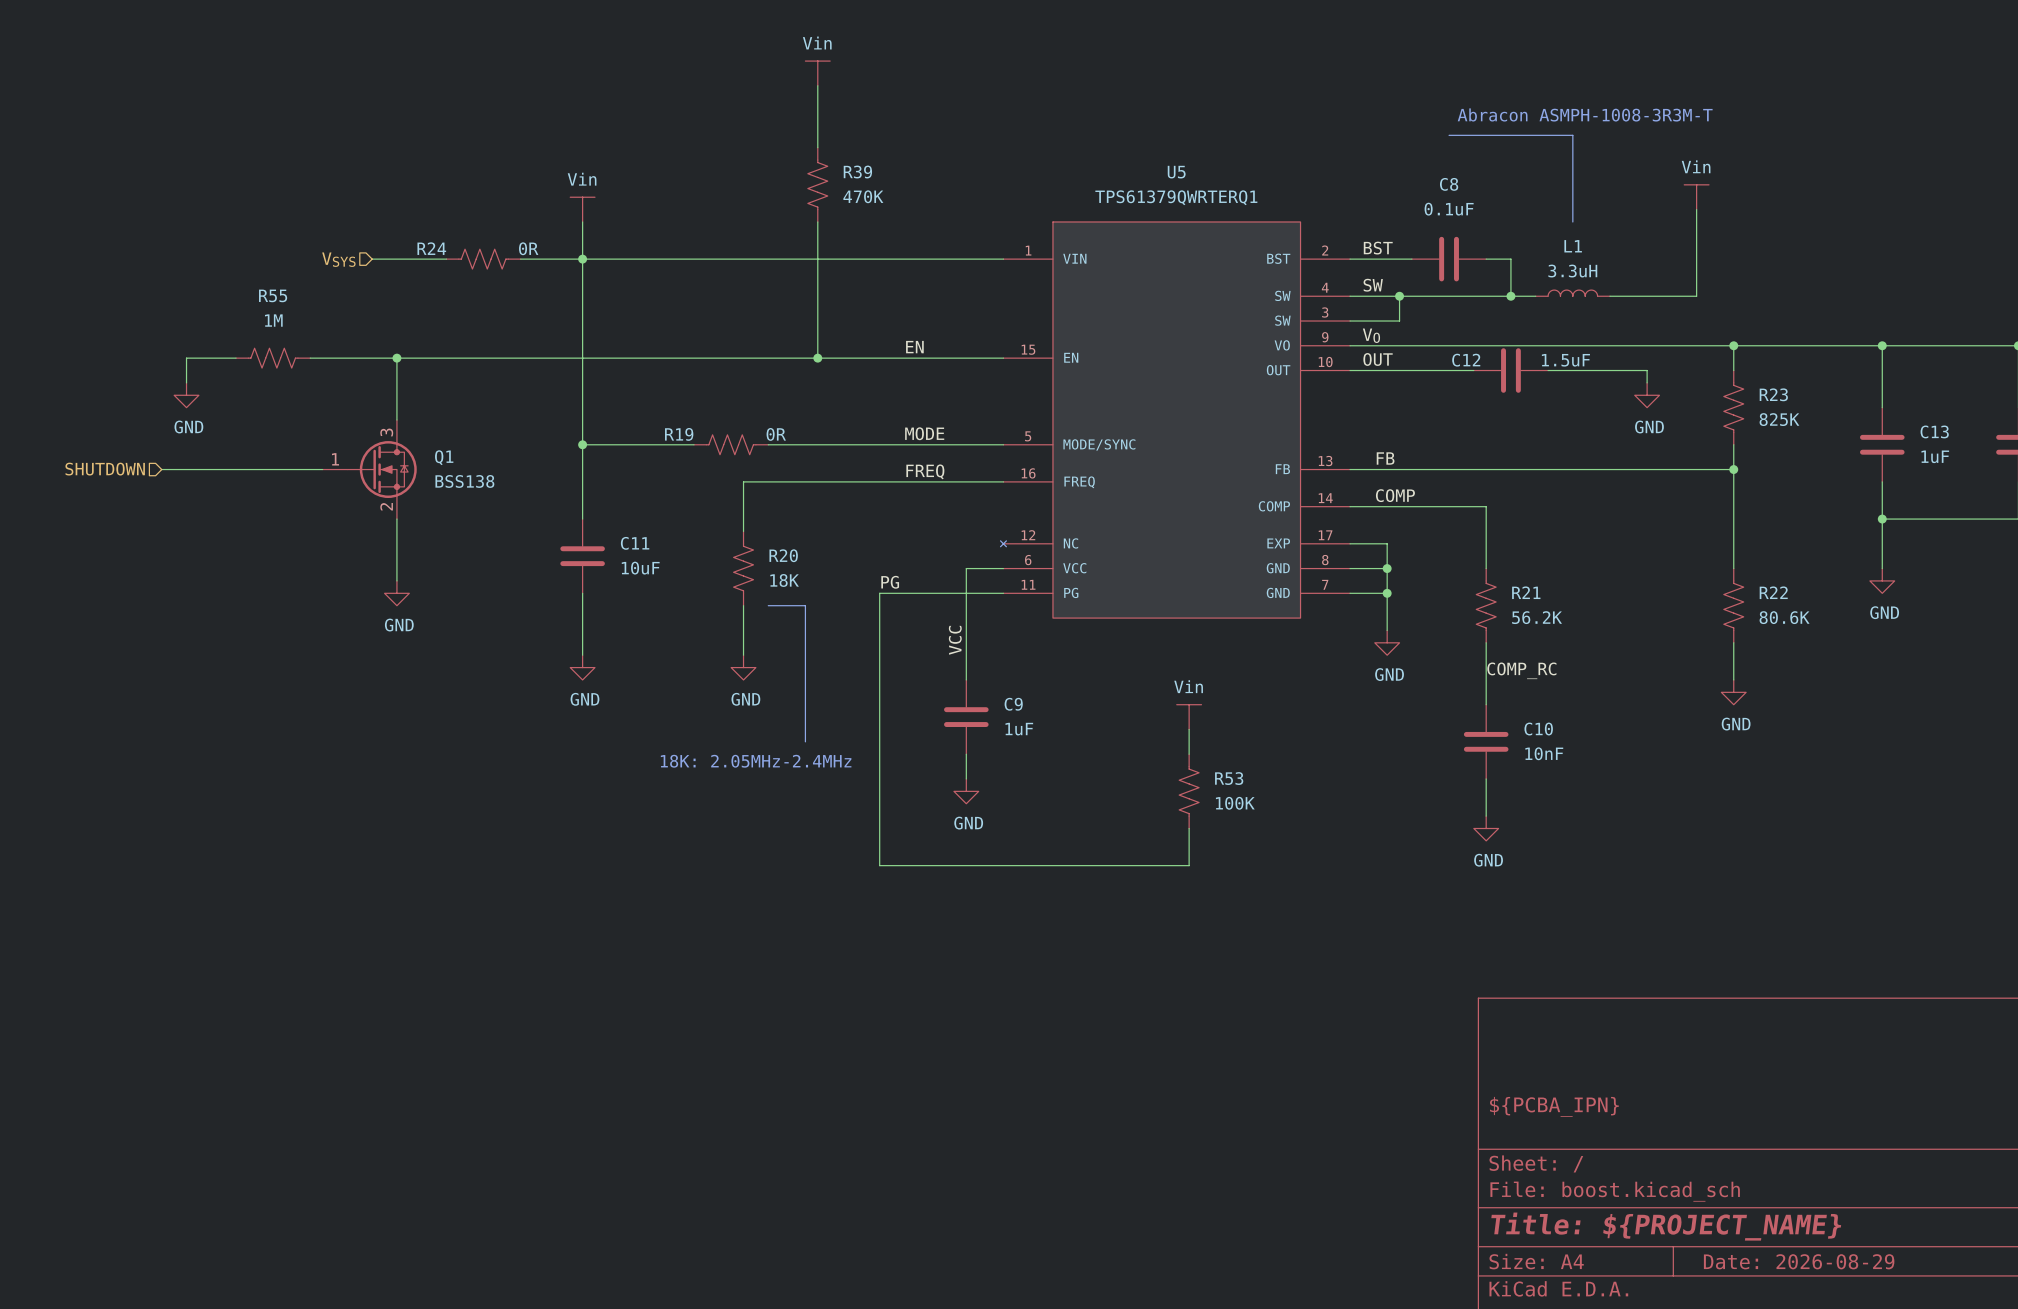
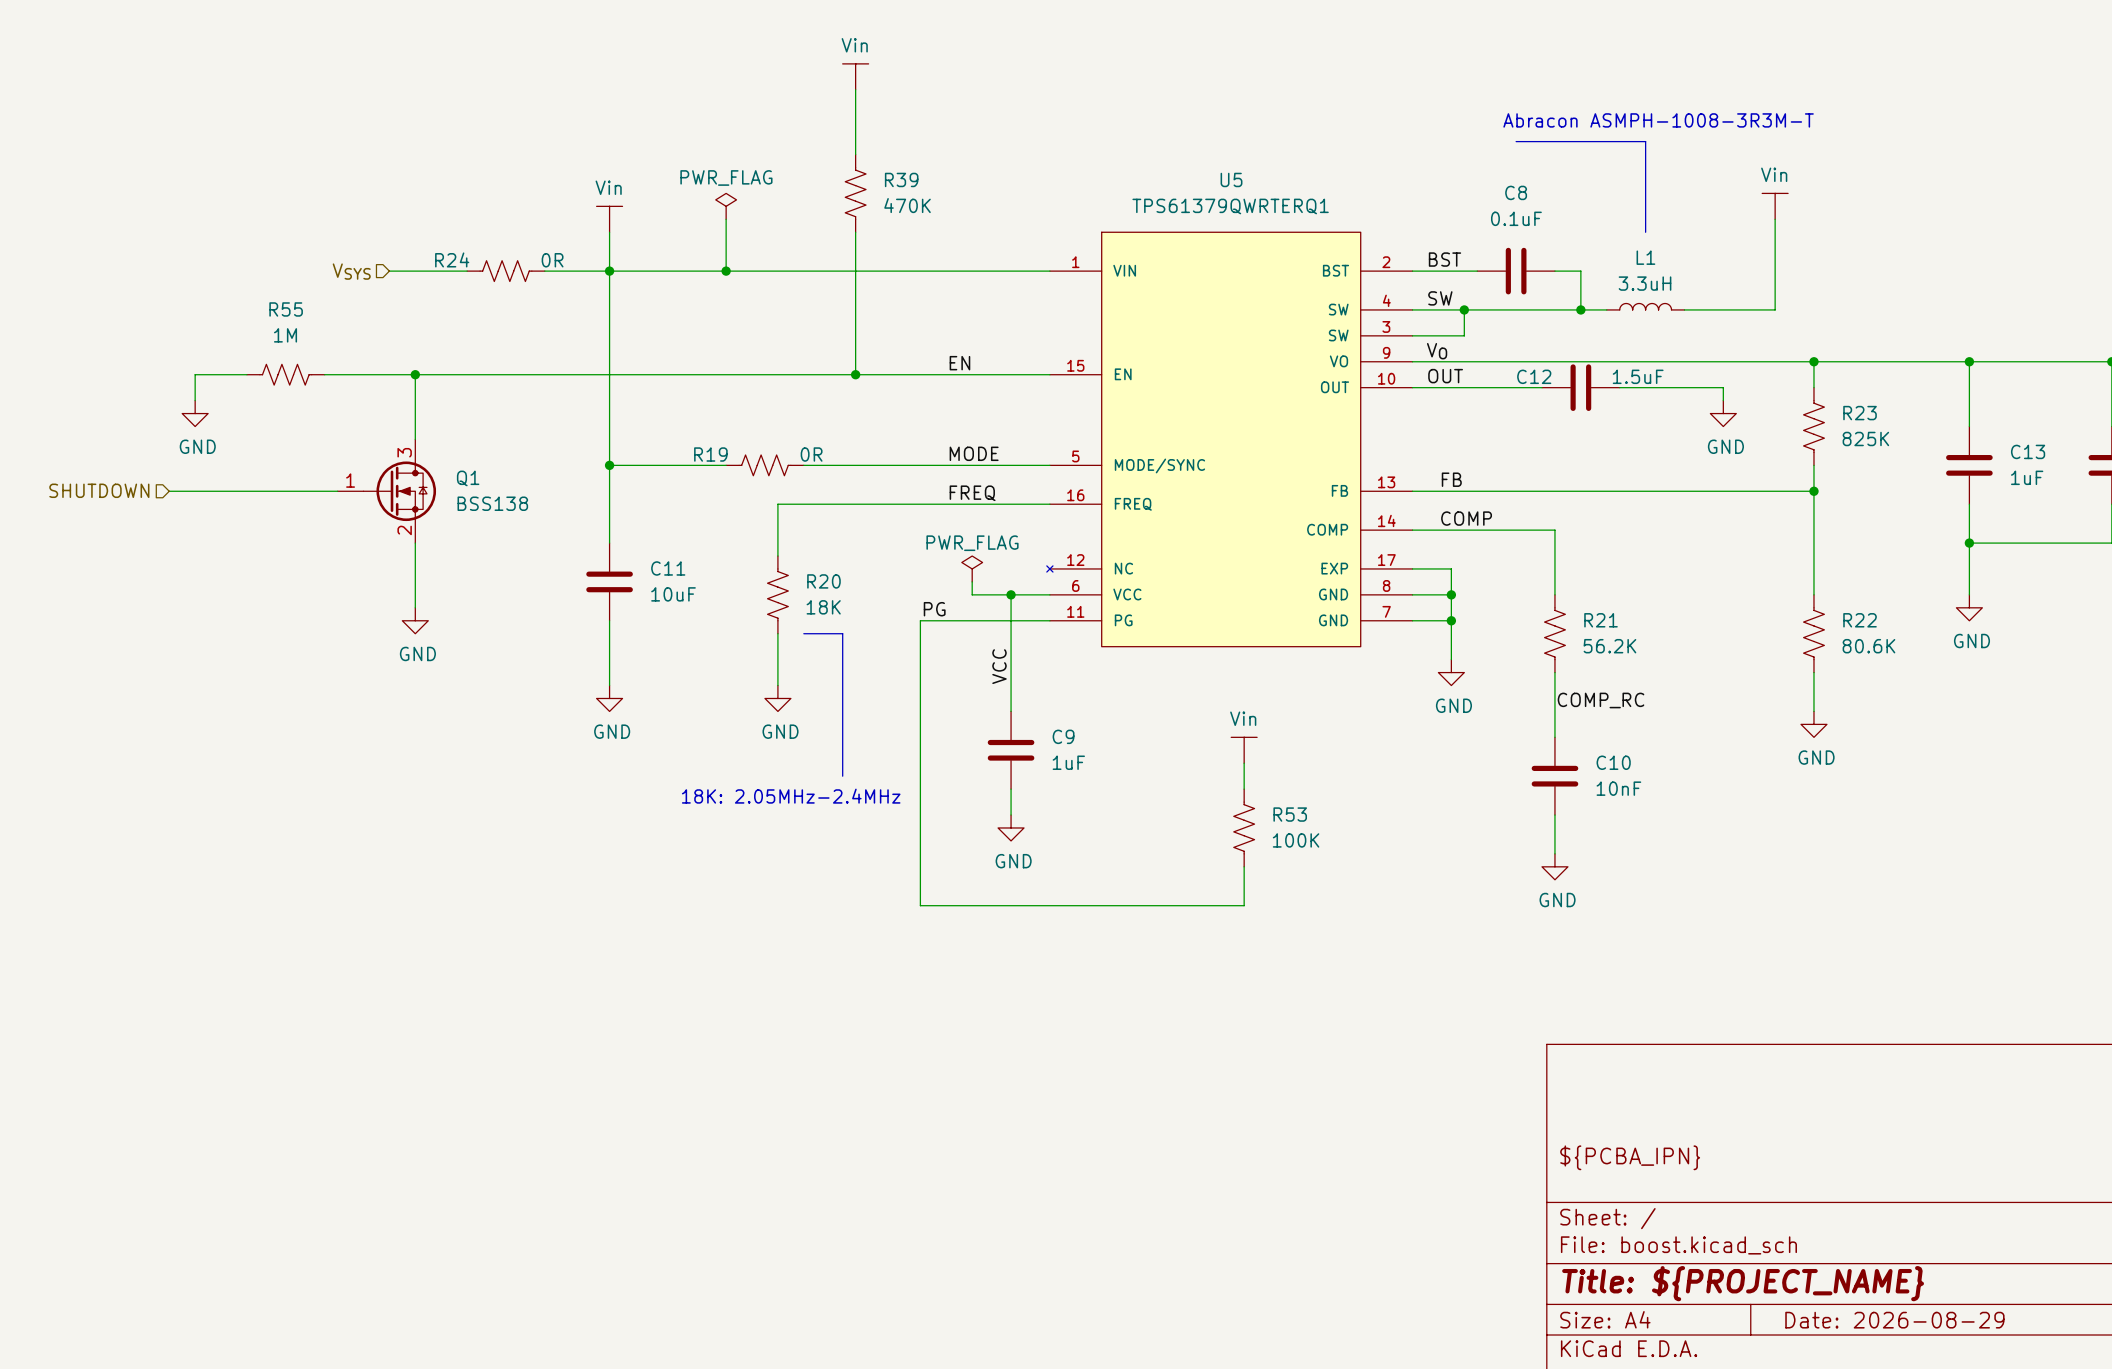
power symbol: none -> PWR_FLAG (726, 206)
wire: none -> (726, 219) (726, 271)
junction: none -> (726, 271)
power symbol: none -> PWR_FLAG (972, 568)
wire: none -> (972, 581) (972, 594) (1011, 594)
junction: none -> (1011, 594)

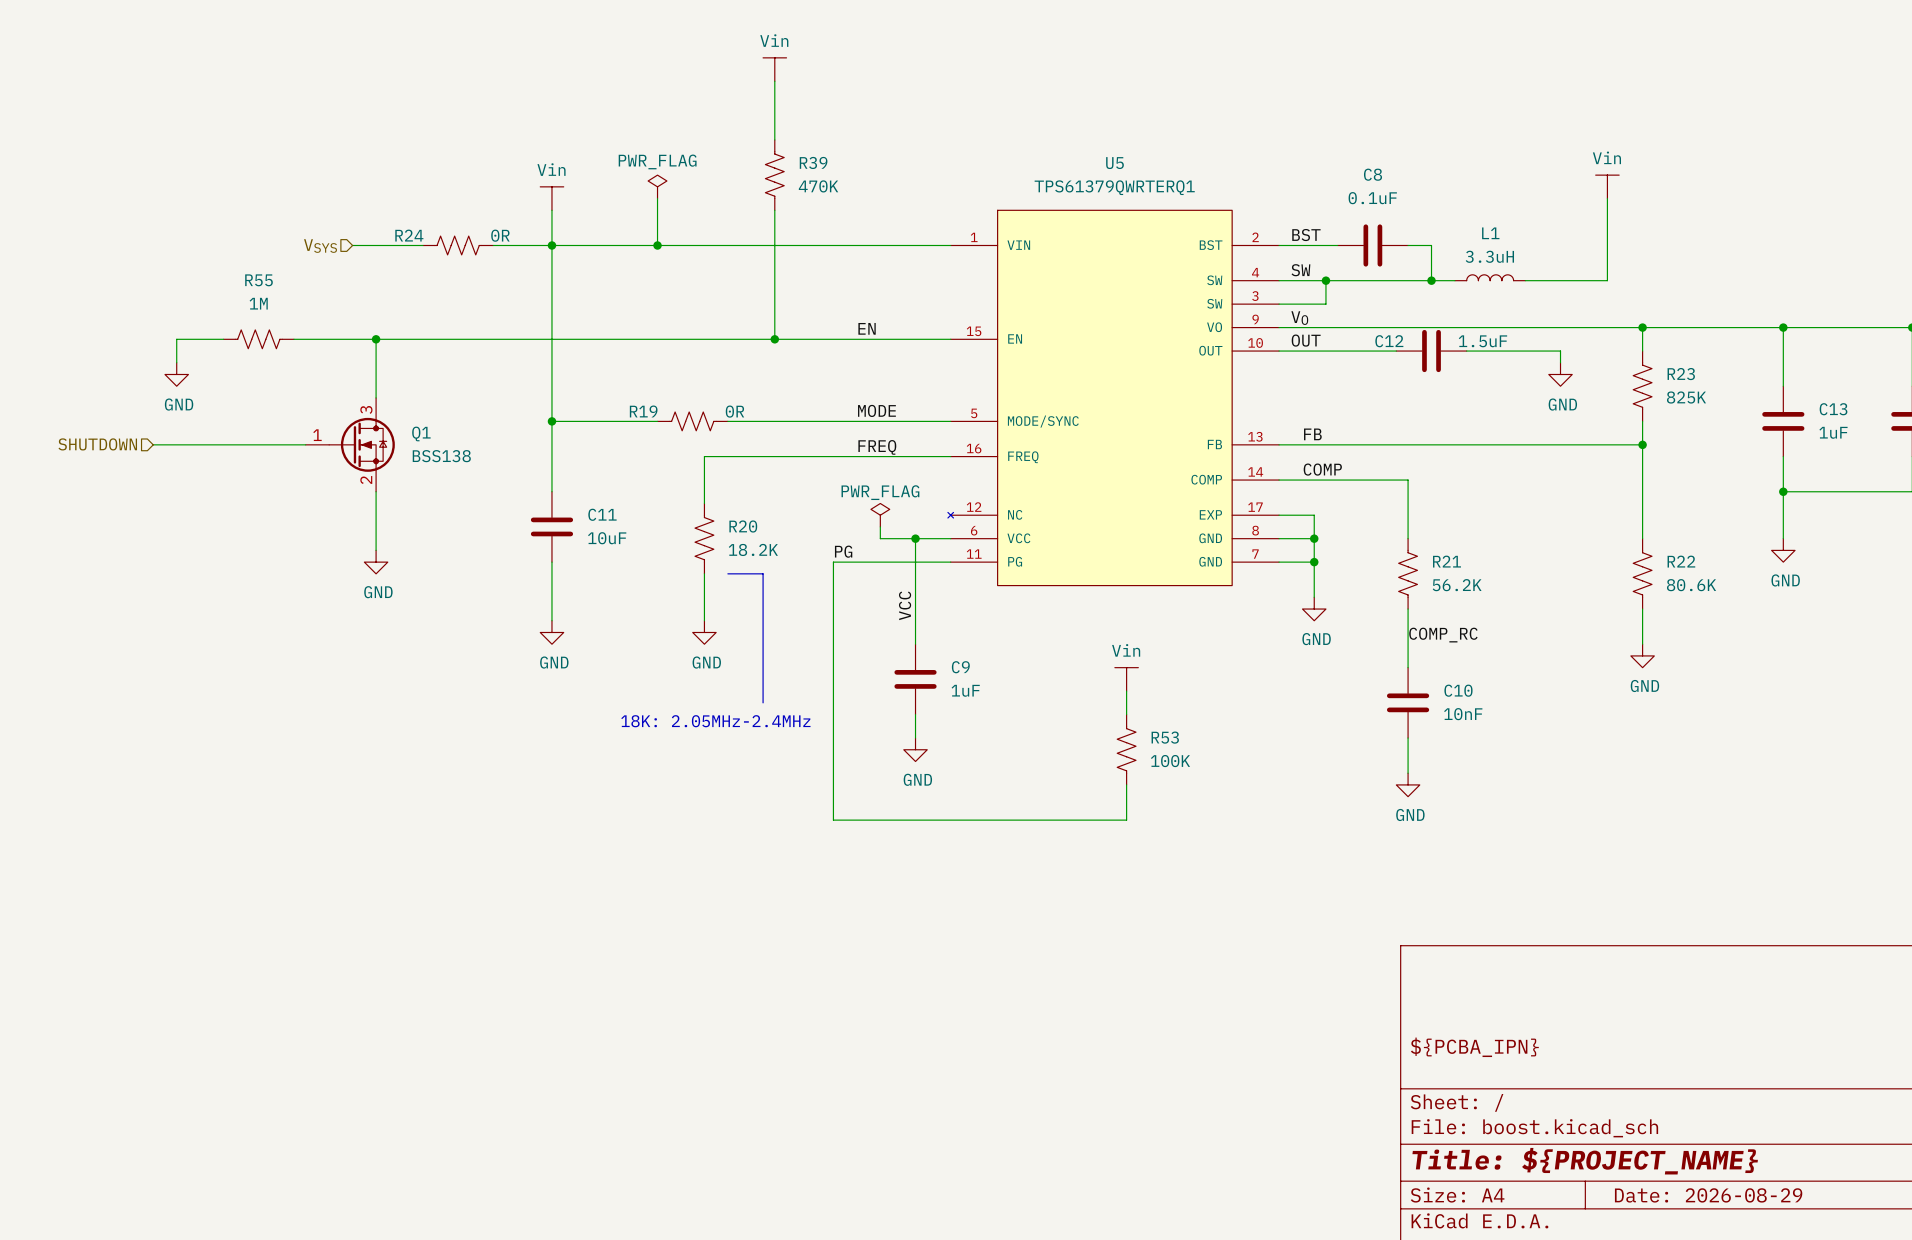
text: Abracon ASMPH-1008-3R3M-T (1658, 120) -> none
line: (1516, 141) (1645, 141) (1645, 232) -> none
R20 value: 18K (823, 607) -> 18.2K (753, 549)

